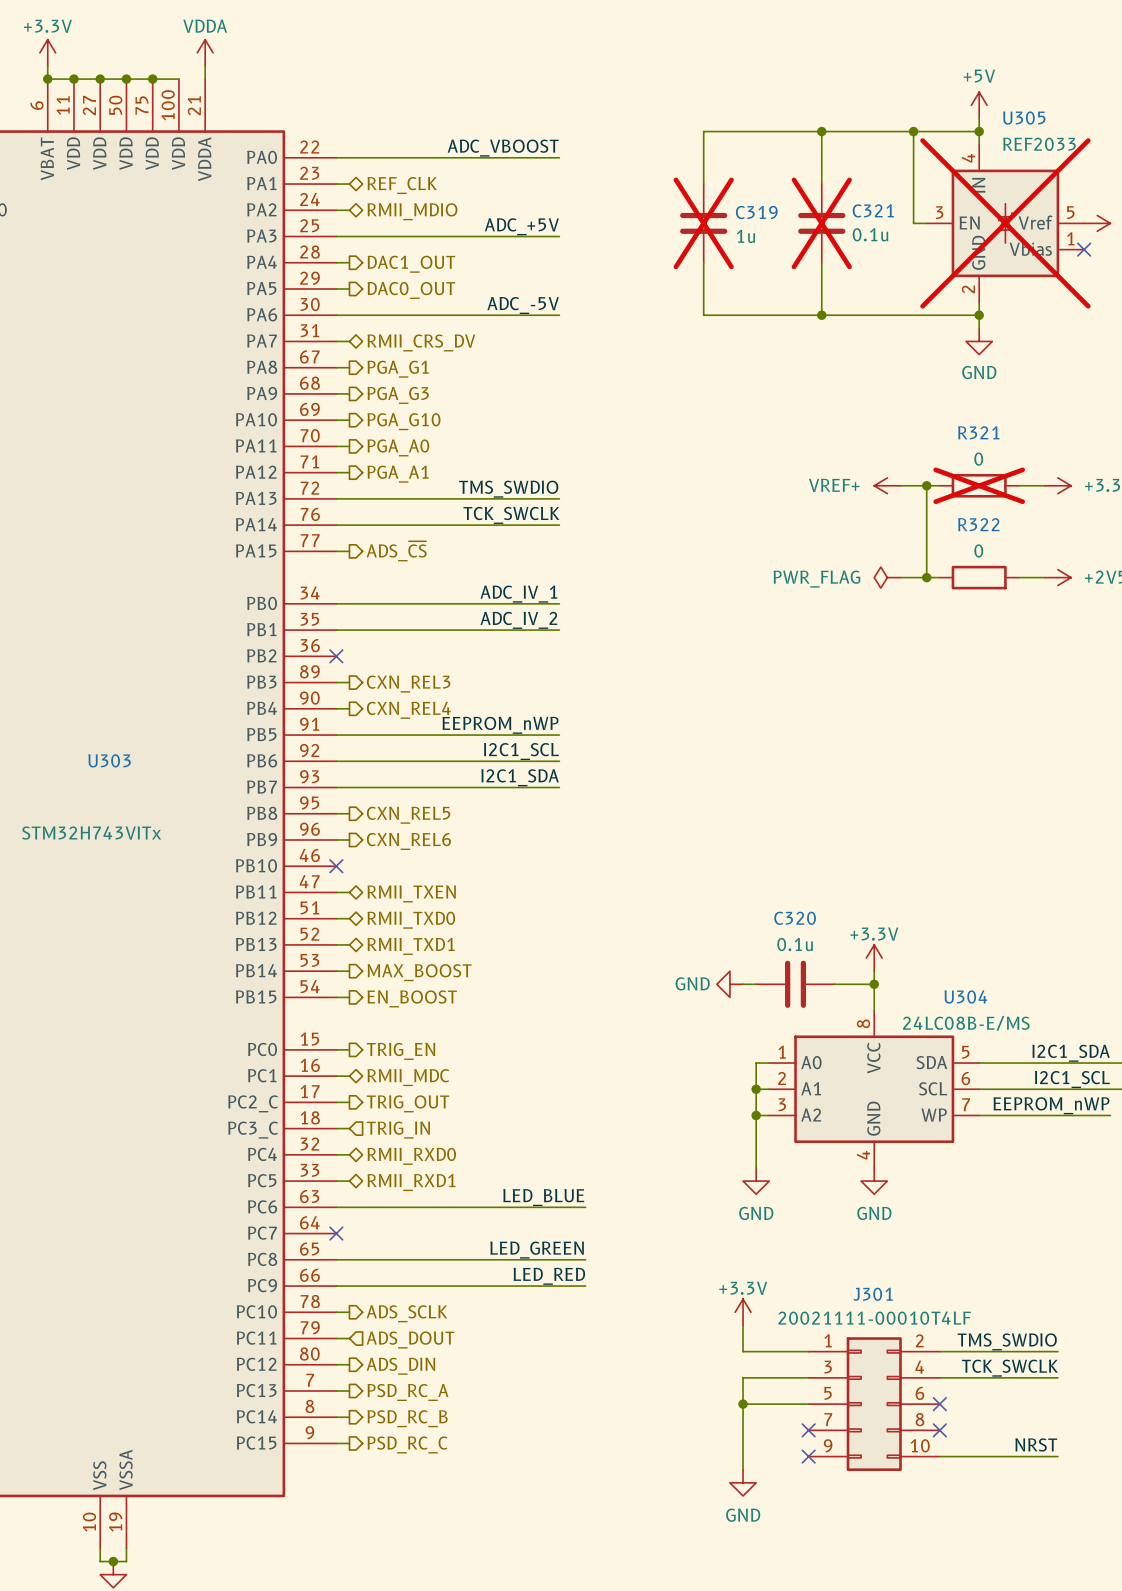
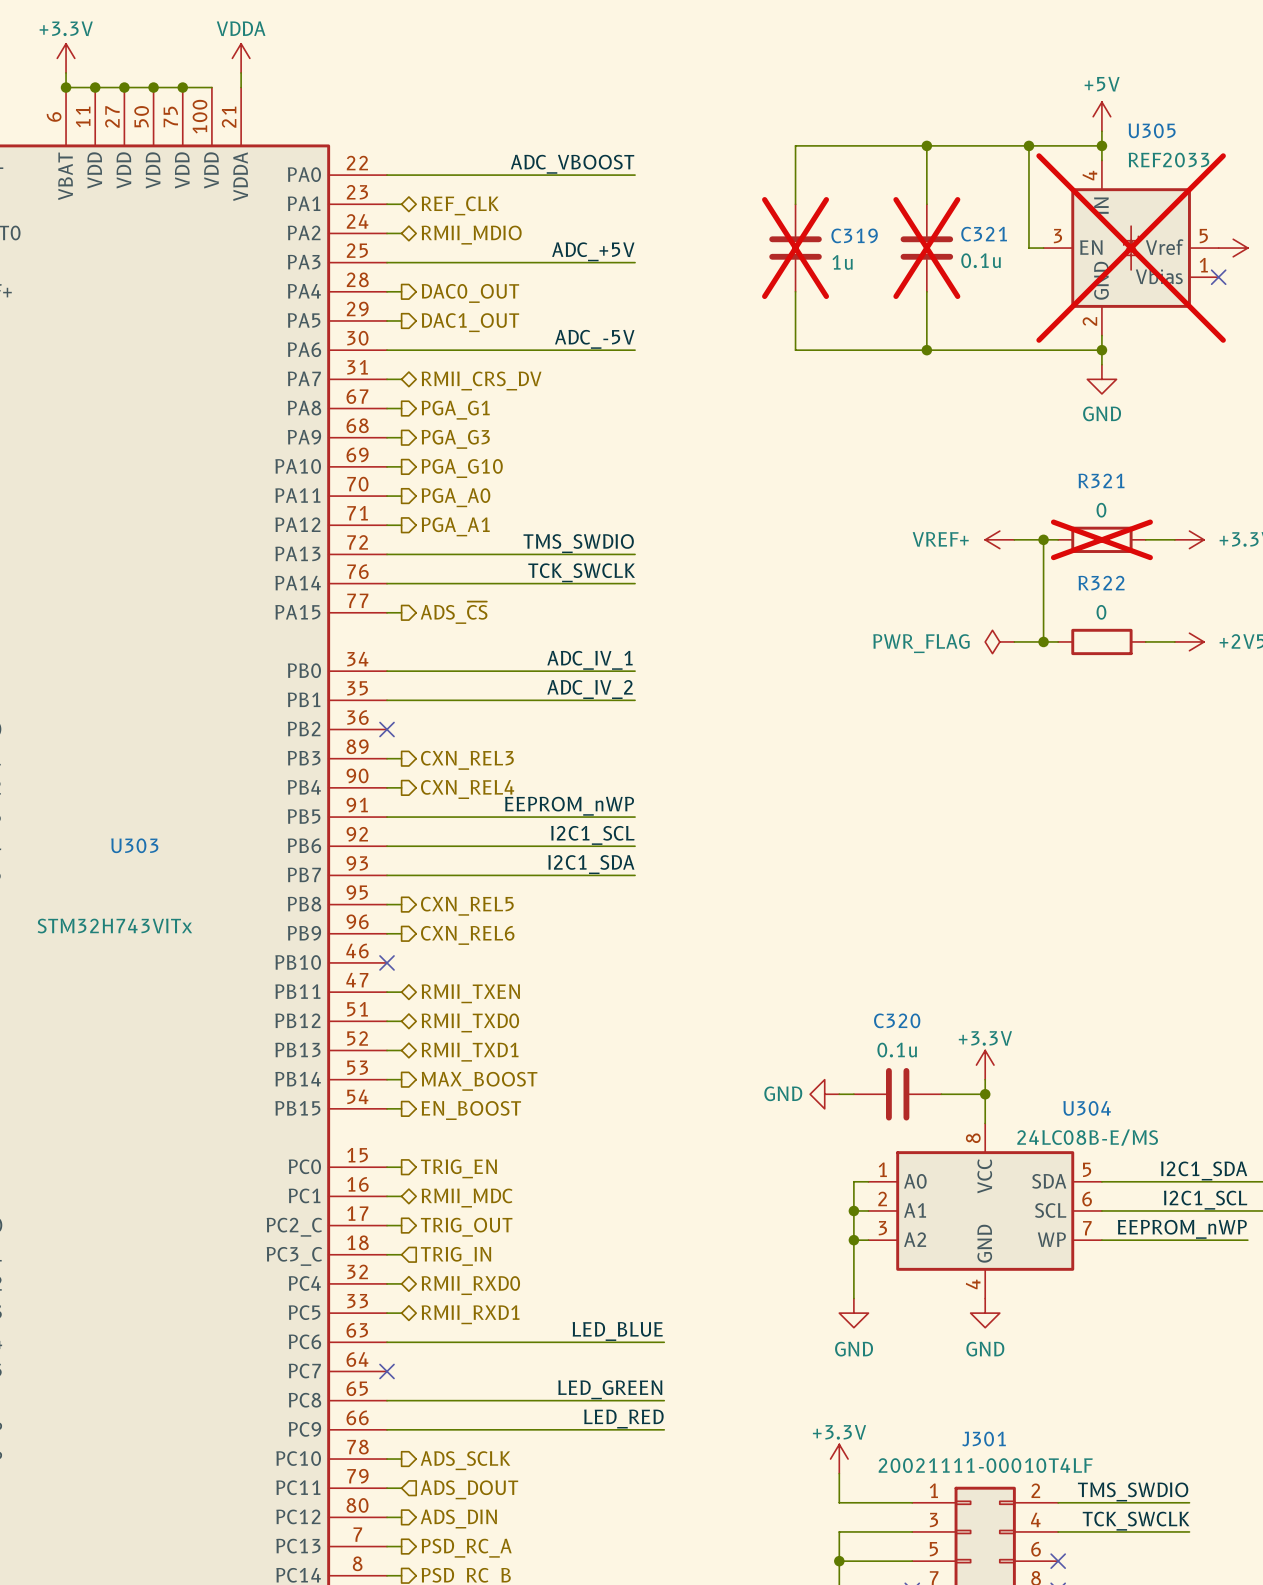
hierarchical label: DAC1_OUT (411, 264) -> DAC0_OUT (470, 293)
hierarchical label: DAC0_OUT (411, 290) -> DAC1_OUT (470, 322)

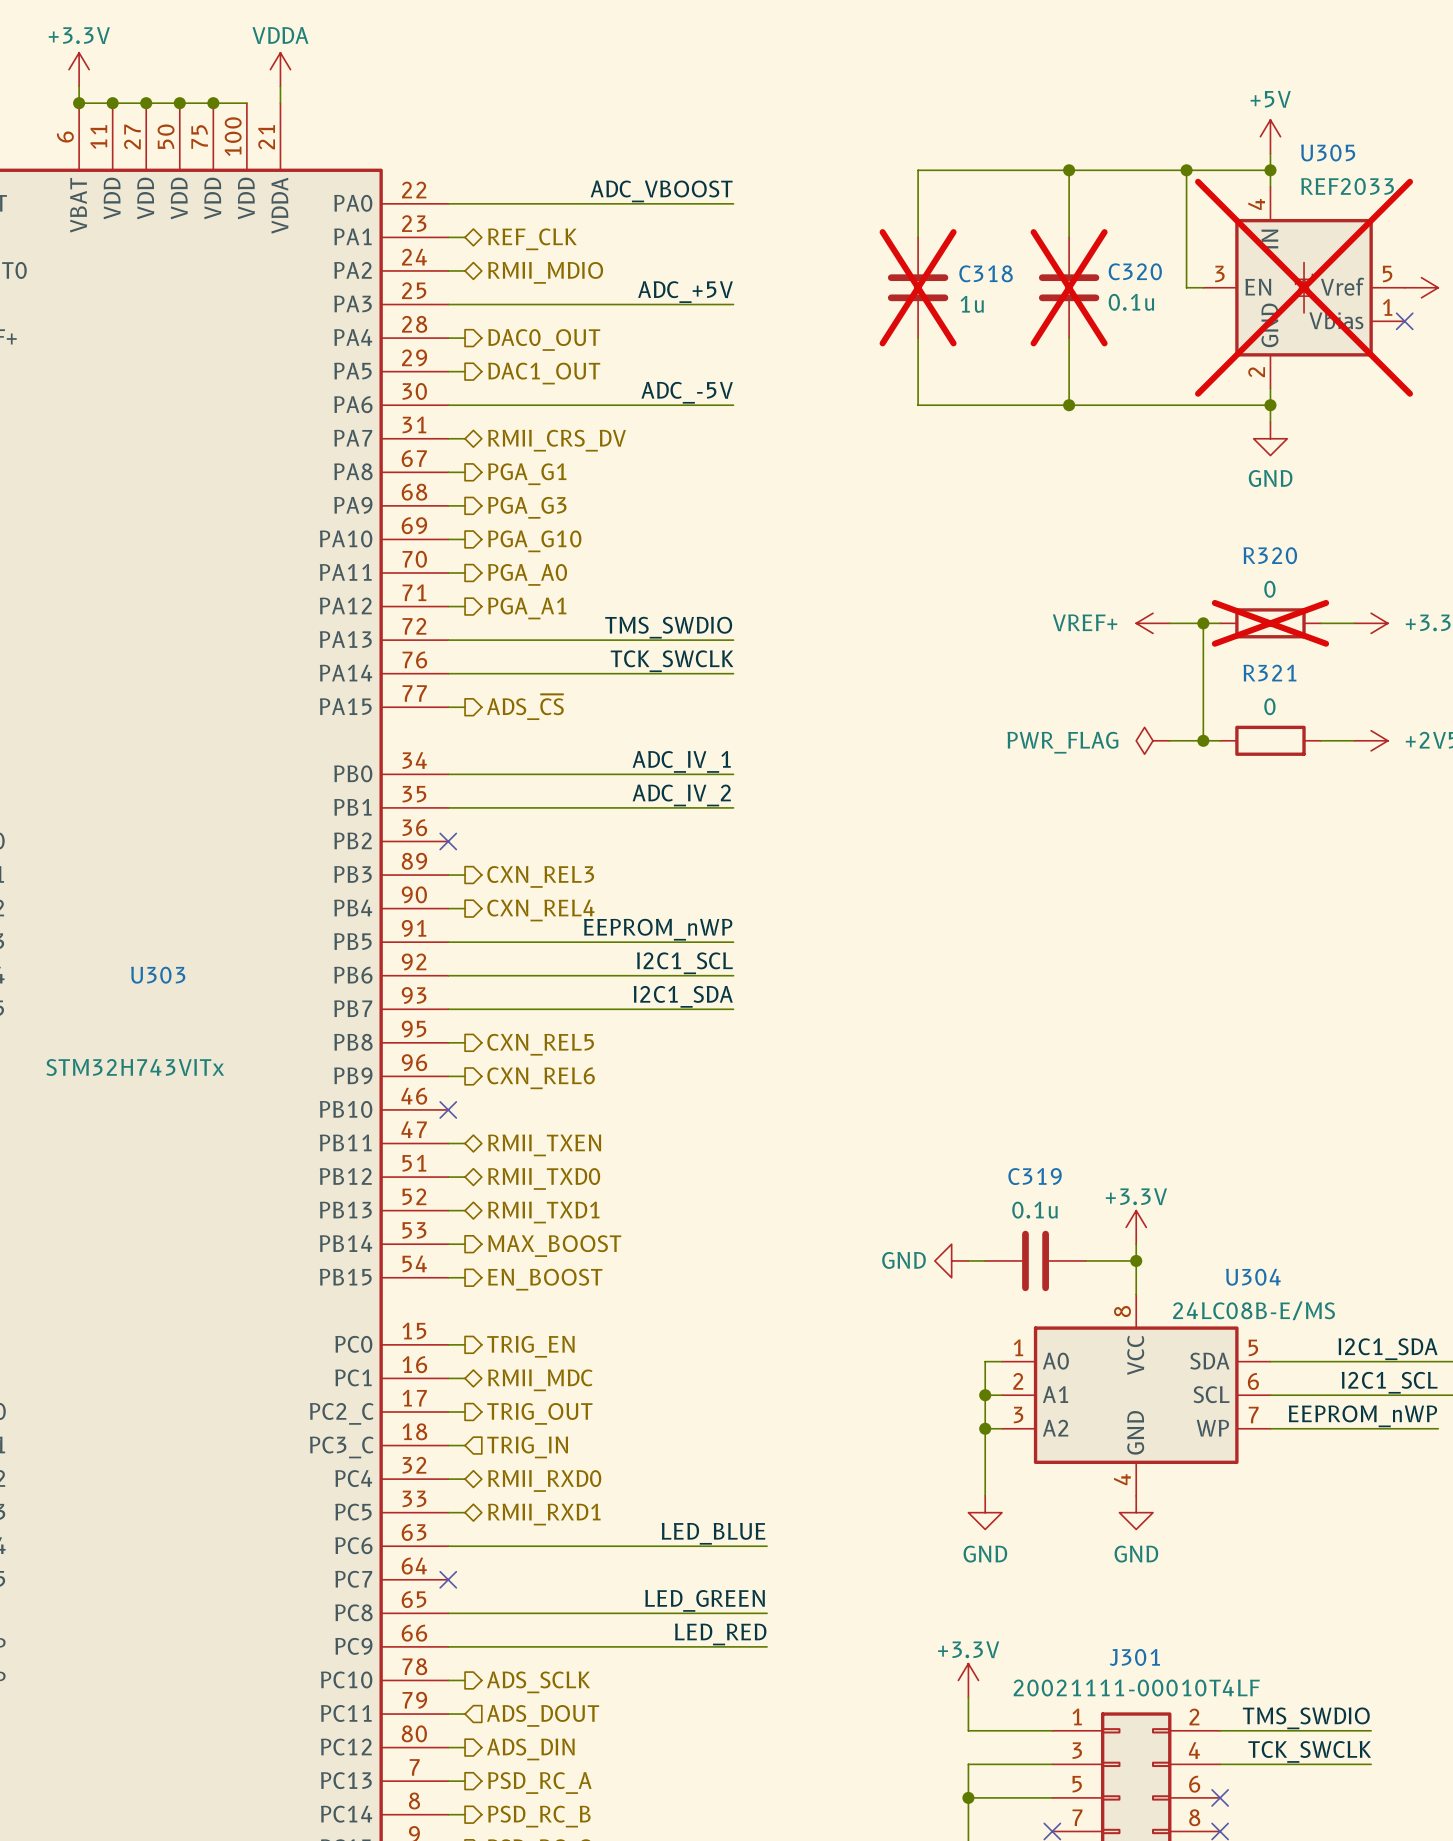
C321 name: C321 (984, 234) -> C320 (1135, 271)
C319 name: C319 (854, 235) -> C318 (986, 273)
R321 name: R321 (1101, 480) -> R320 (1270, 555)
R322 name: R322 (1101, 583) -> R321 (1269, 673)
C320 name: C320 (897, 1020) -> C319 (1035, 1176)

